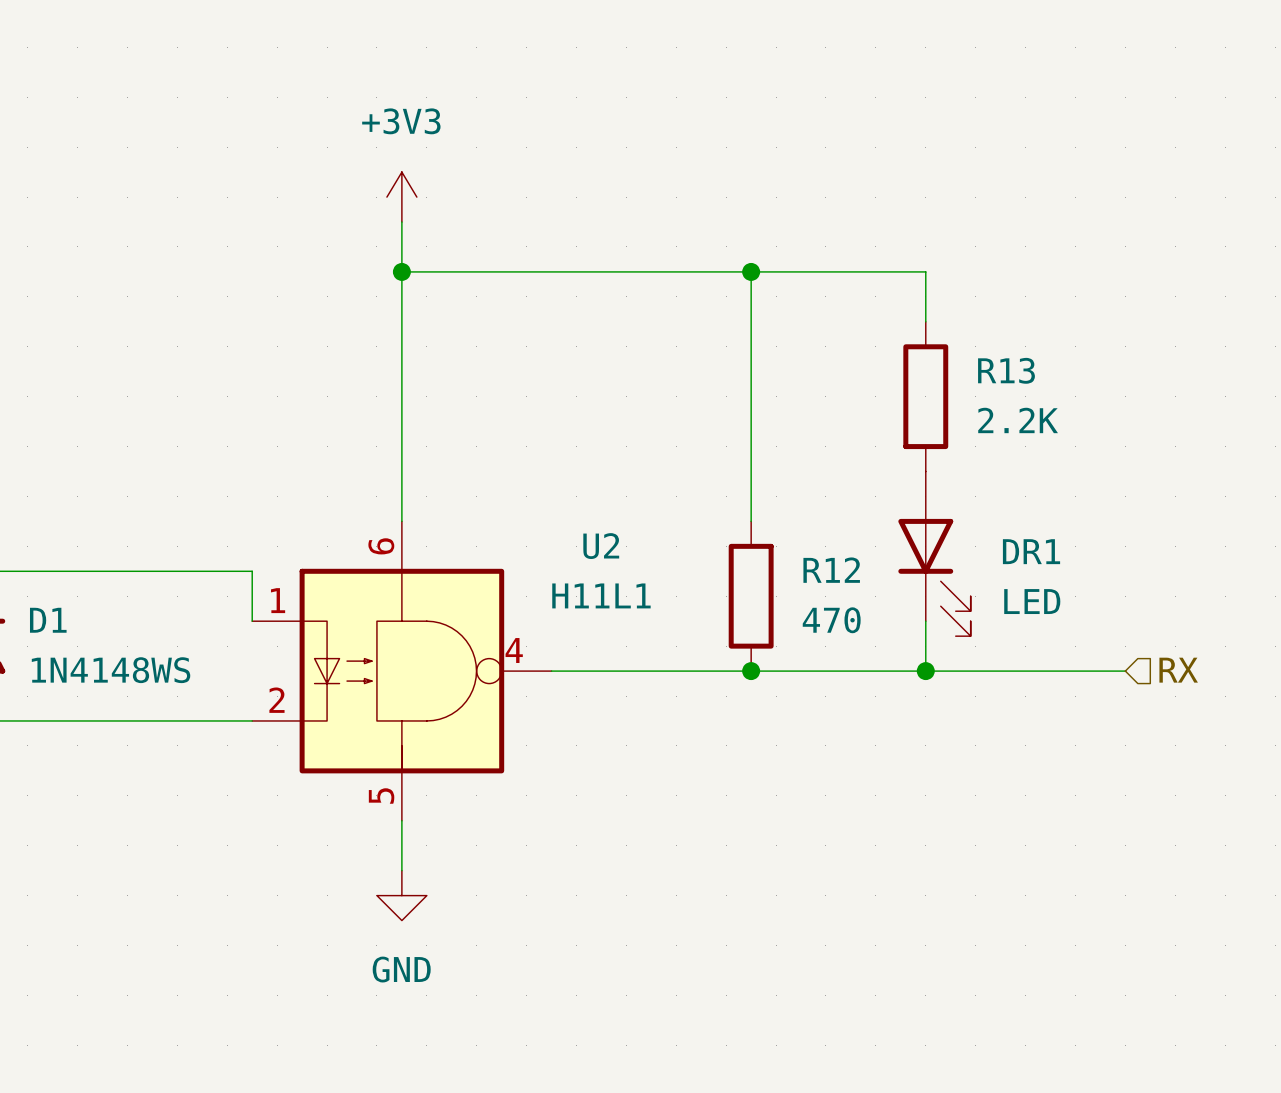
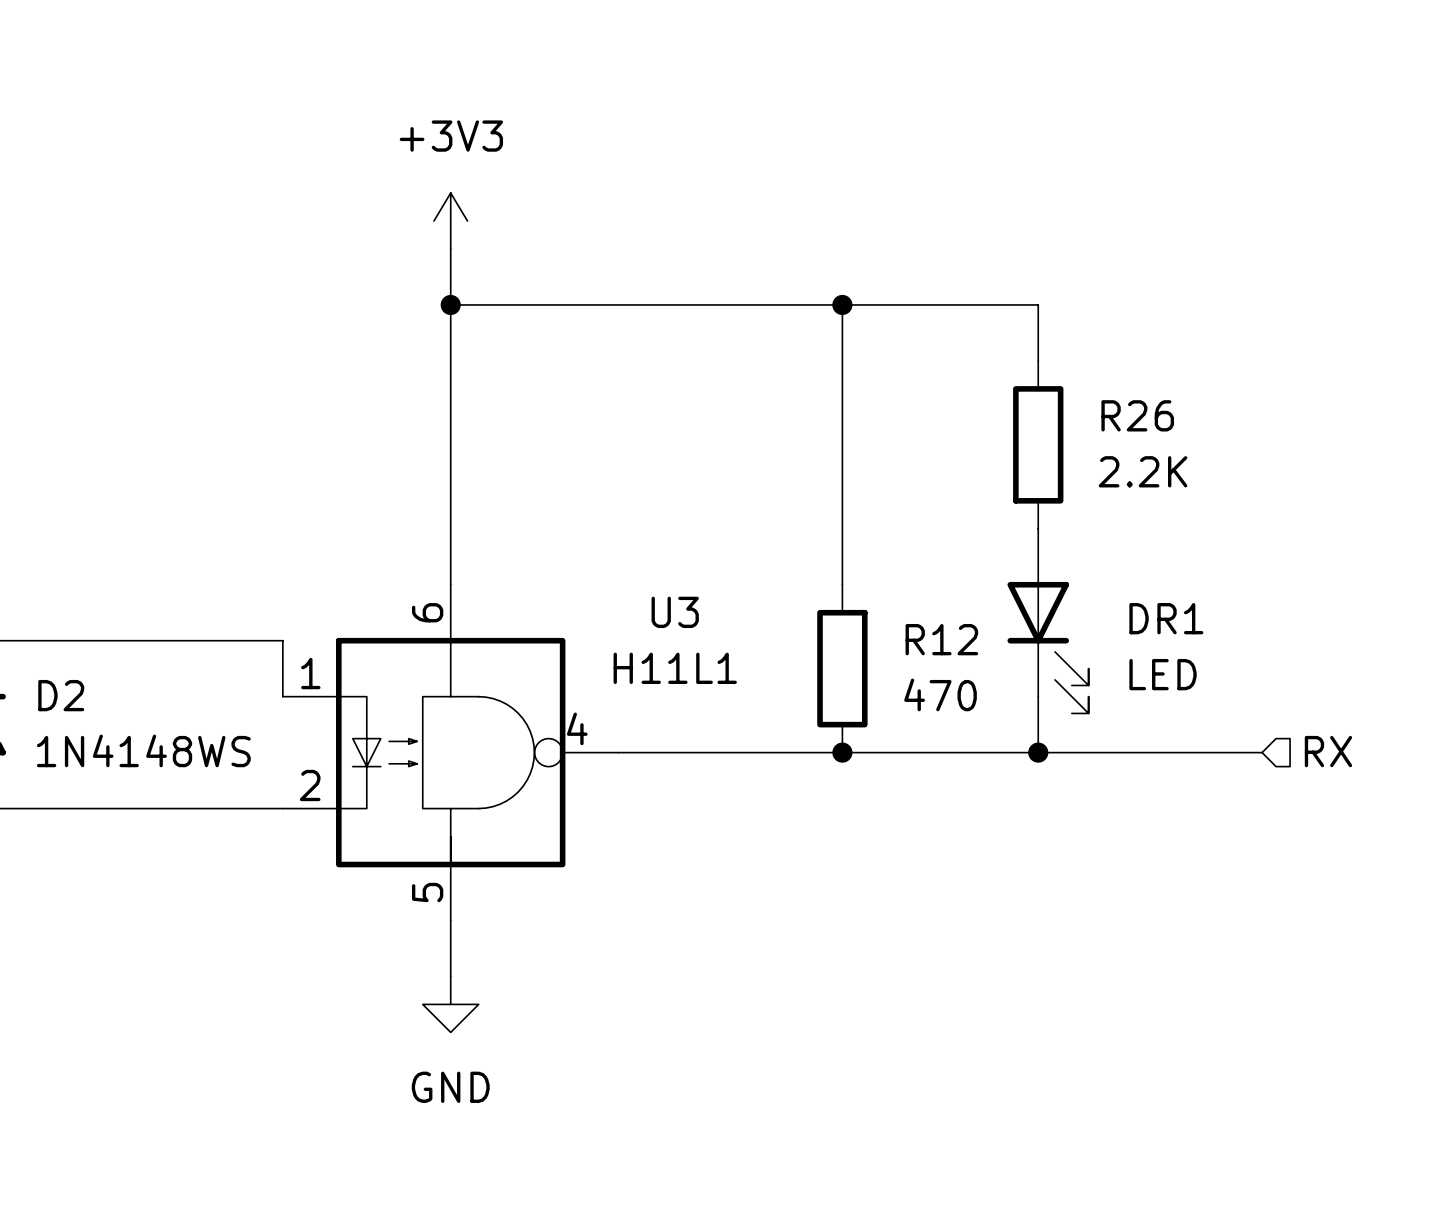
R13 name: R13 (1006, 370) -> R26 (1137, 415)
U2 name: U2 (601, 546) -> U3 (675, 612)
D1 name: D1 (48, 620) -> D2 (61, 695)

